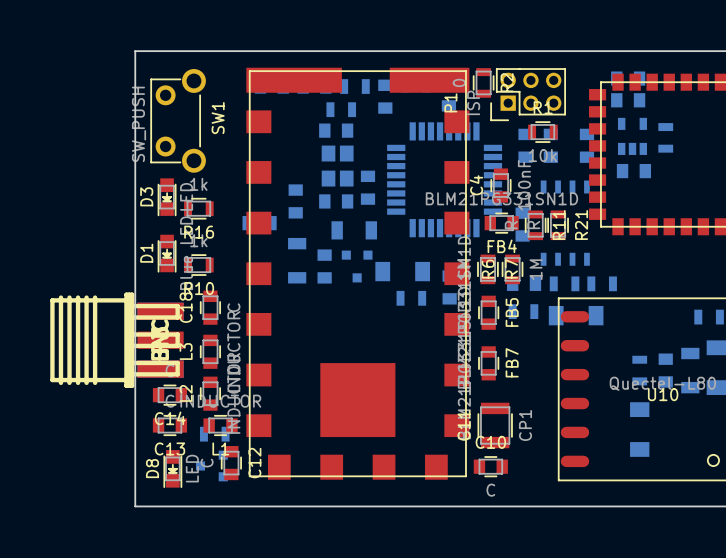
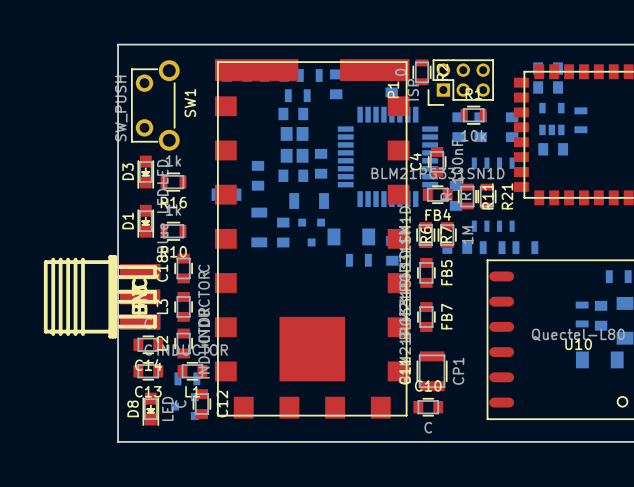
part: (523, 311) -> none
part: (576, 315) -> none
part footprint: [681, 347, 700, 394] -> [594, 300, 608, 331]
part footprint: [658, 353, 673, 388] -> [575, 301, 589, 328]
part: (639, 370) -> none
part rotation: 0° (639, 429) -> 90° clockwise (599, 359)
part position: (639, 429) -> (599, 359)

